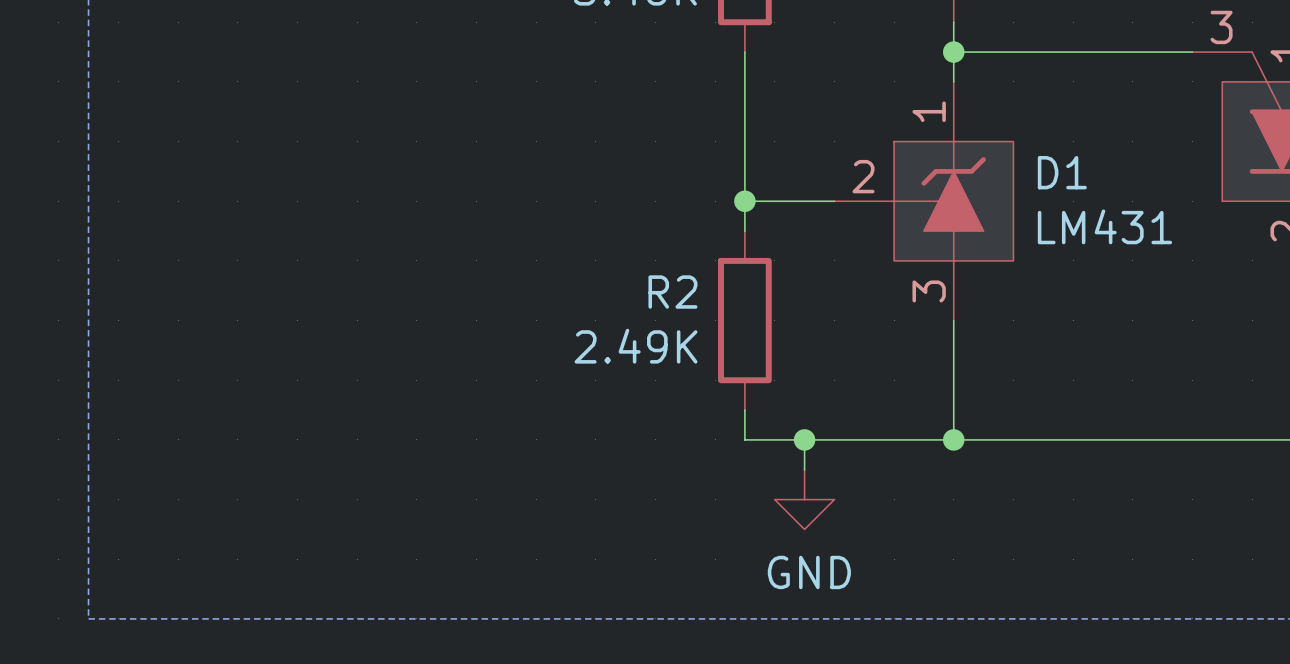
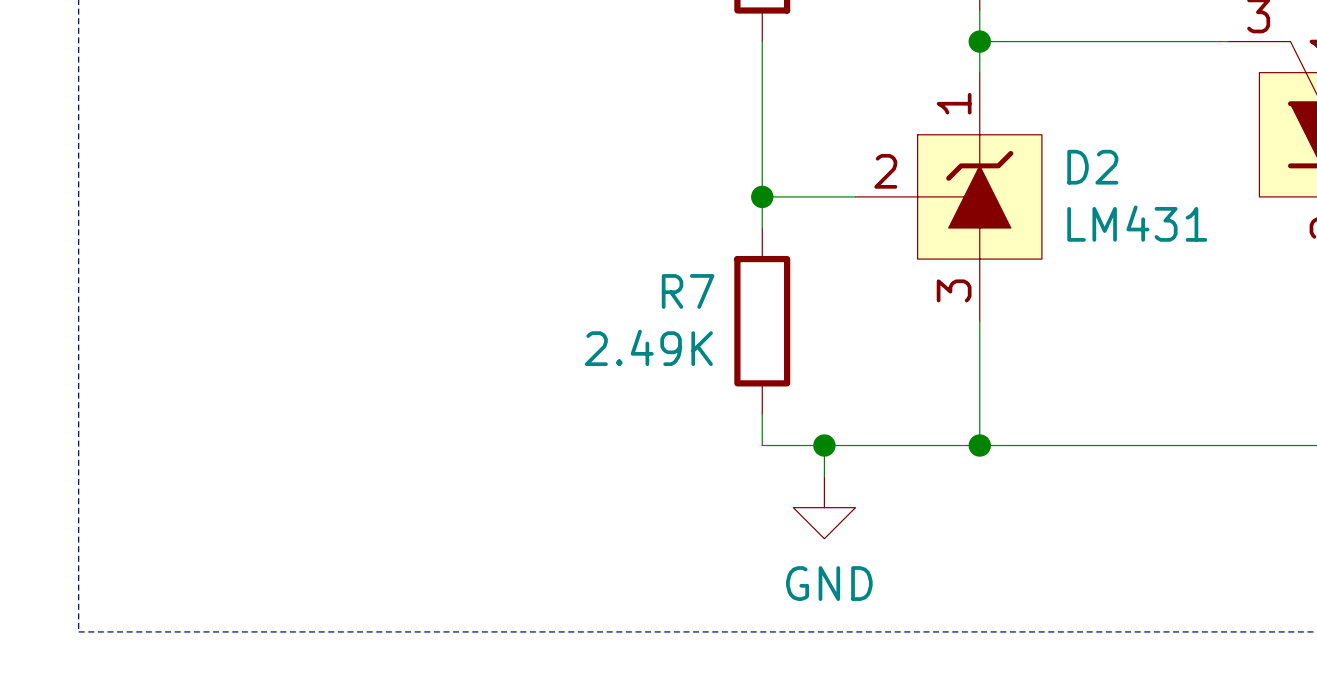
D1 name: D1 (1062, 172) -> D2 (1092, 167)
R2 name: R2 (672, 292) -> R7 (688, 291)

